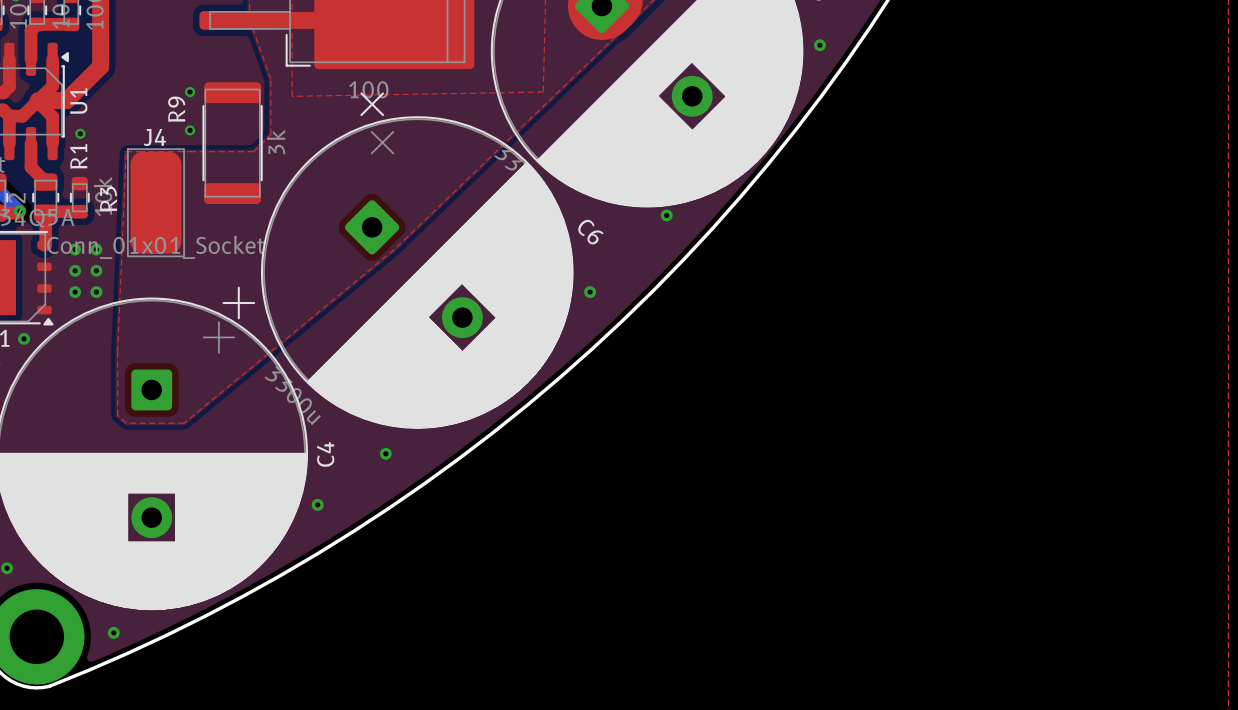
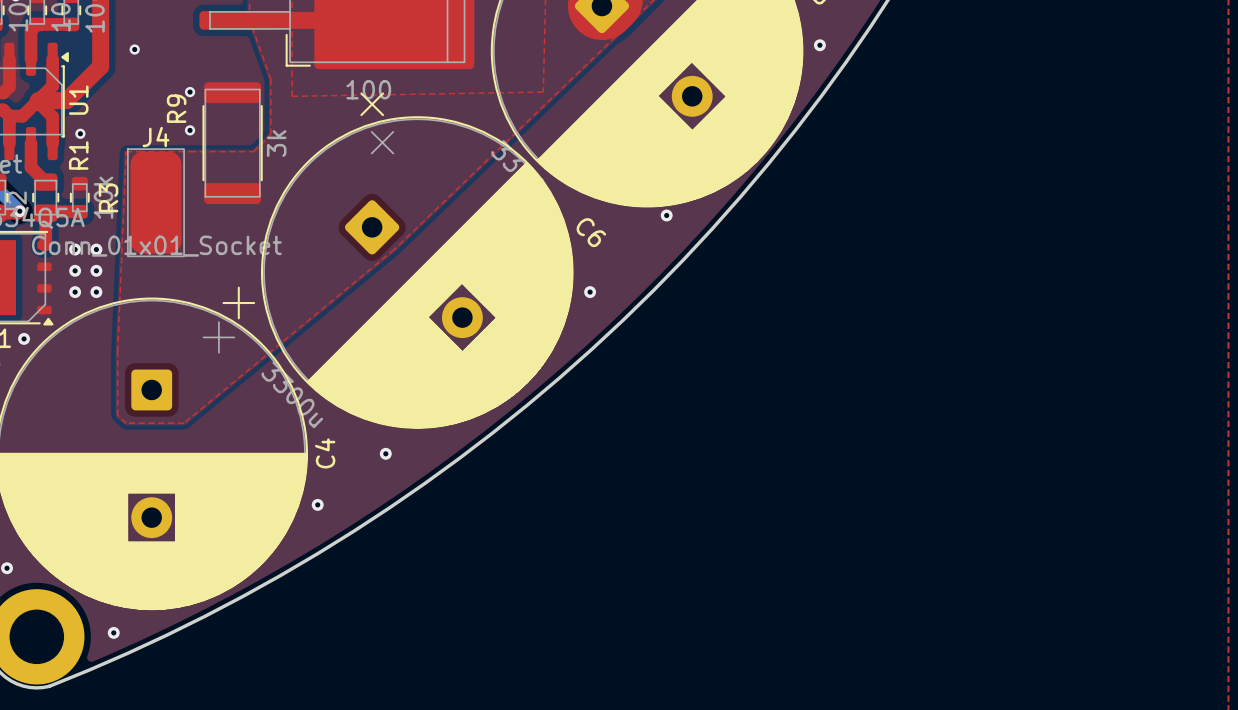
via: none -> (134, 49)

